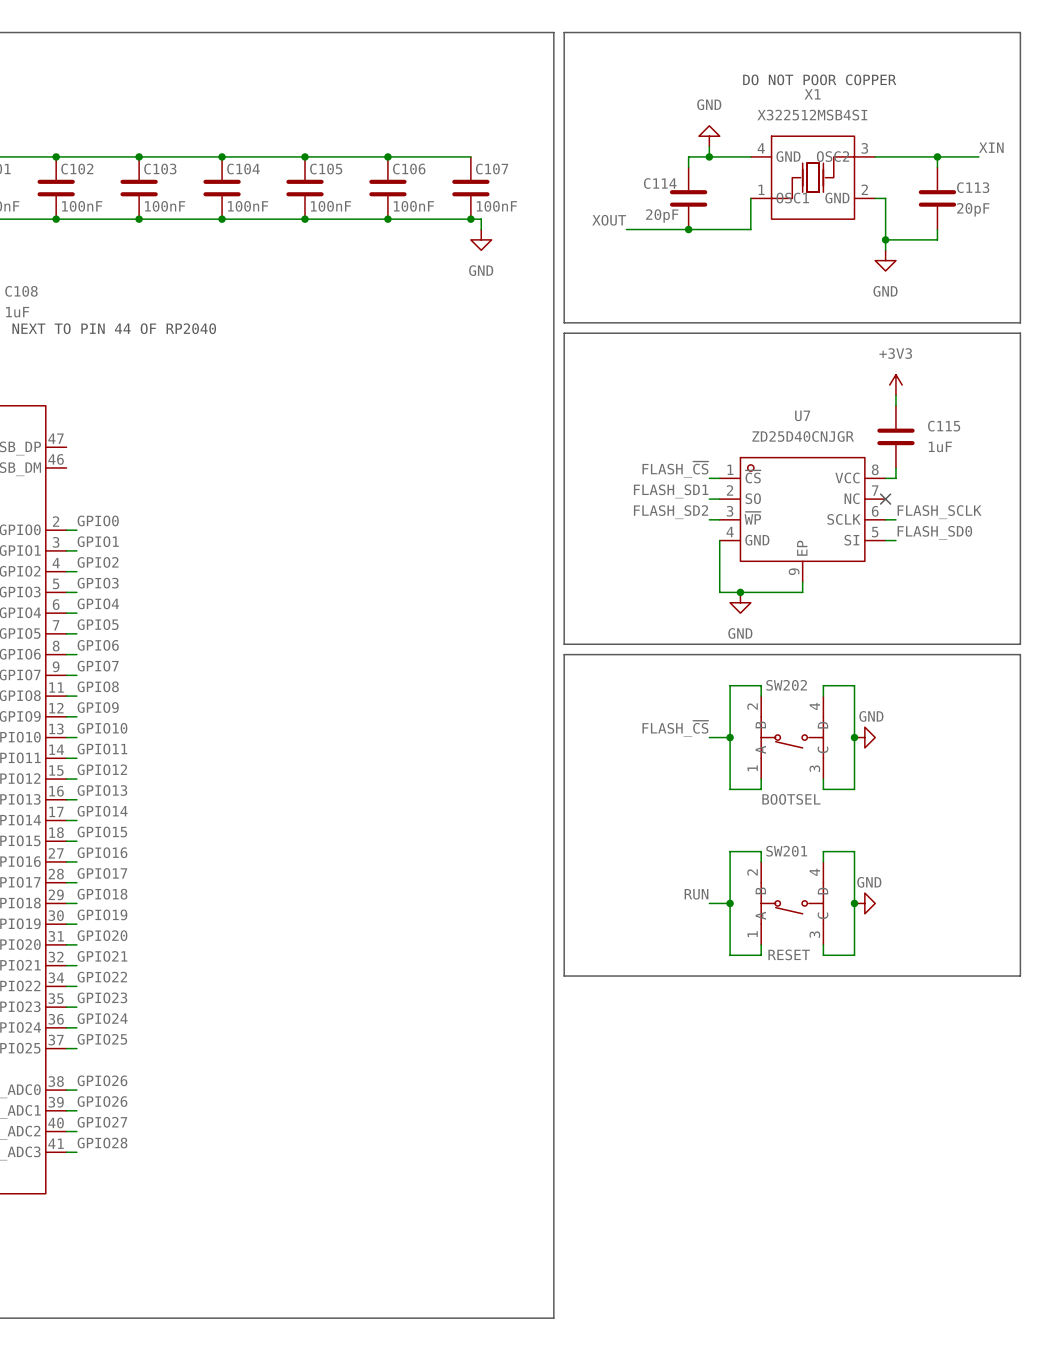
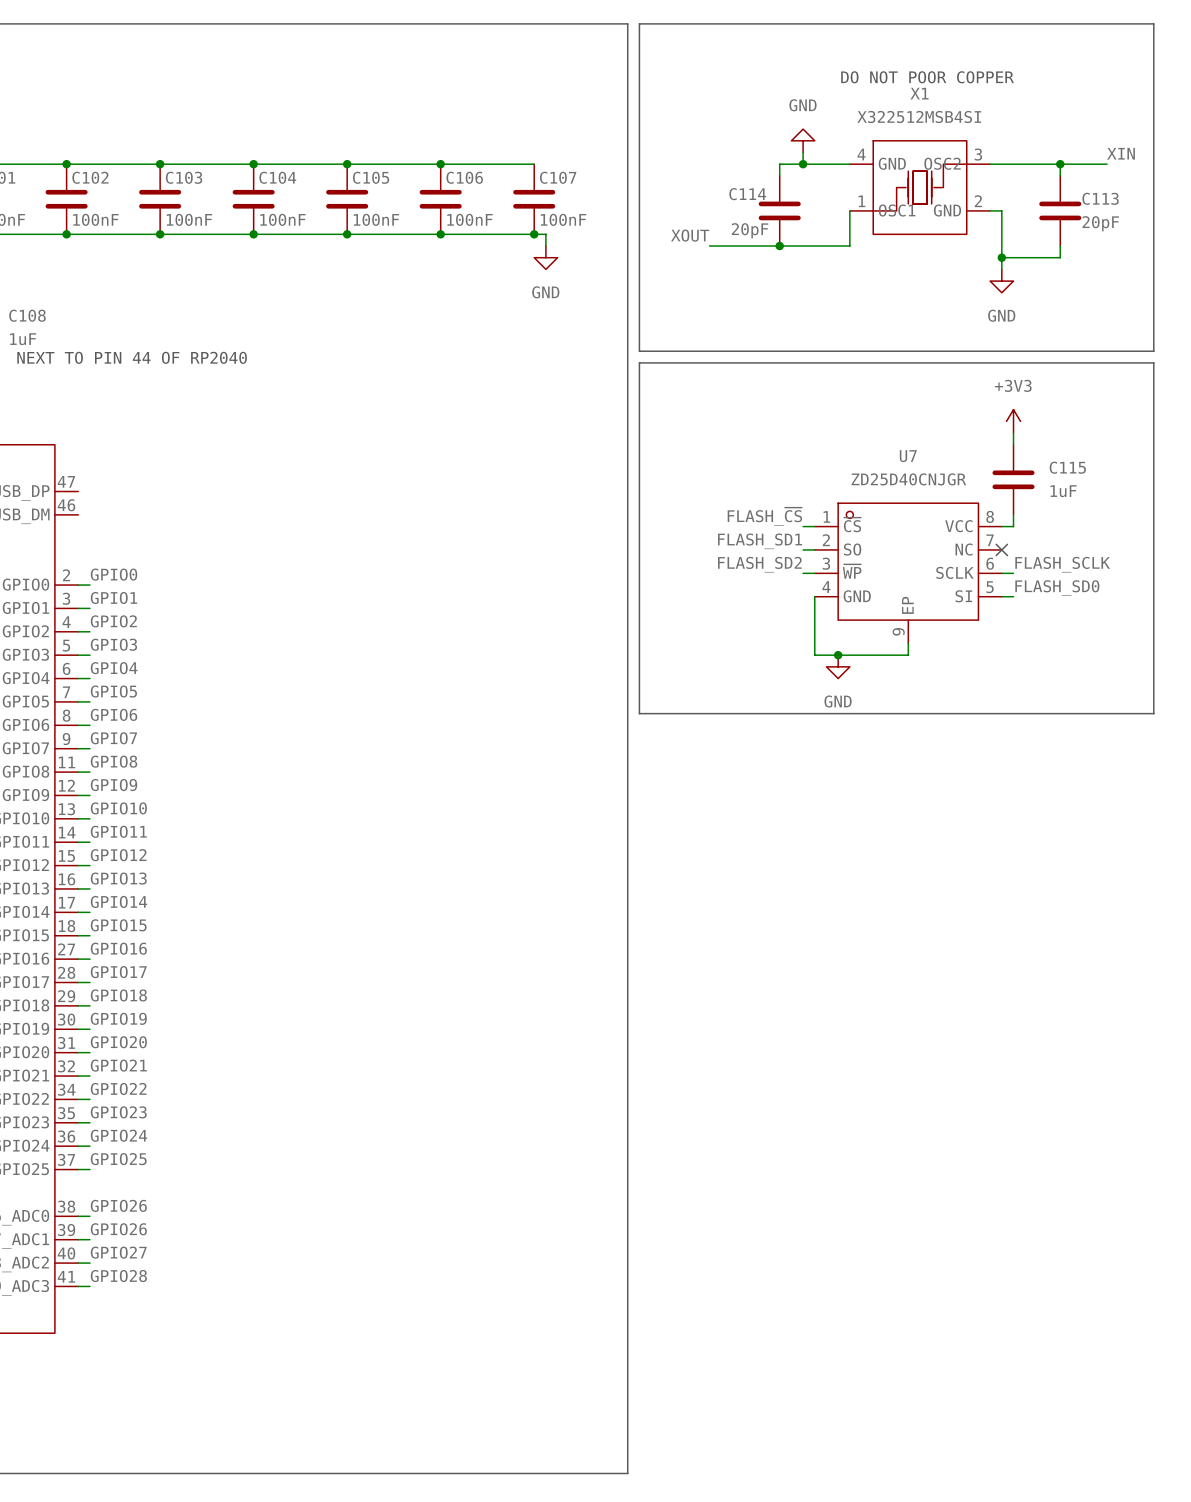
line: (564, 654) (1020, 654) (1020, 976) (564, 976) (564, 654) -> none
wire: (761, 696) (761, 685) (730, 685) (730, 789) (761, 789) (761, 779) -> none
wire: (823, 696) (823, 685) (854, 685) (854, 789) (823, 789) (823, 779) -> none
label: FLASH_~{CS} (675, 728) -> none
wire: (709, 737) (730, 737) -> none
junction: (730, 737) -> none
SW202: BOOTSEL (792, 737) -> none
junction: (854, 737) -> none
power symbol: GND (864, 737) -> none
wire: (761, 861) (761, 851) (730, 851) (730, 955) (761, 955) (761, 944) -> none
wire: (823, 861) (823, 851) (854, 851) (854, 955) (823, 955) (823, 944) -> none
label: RUN (696, 894) -> none
wire: (709, 903) (730, 903) -> none
junction: (730, 903) -> none
SW201: RESET (792, 903) -> none
junction: (854, 903) -> none
power symbol: GND (864, 903) -> none

